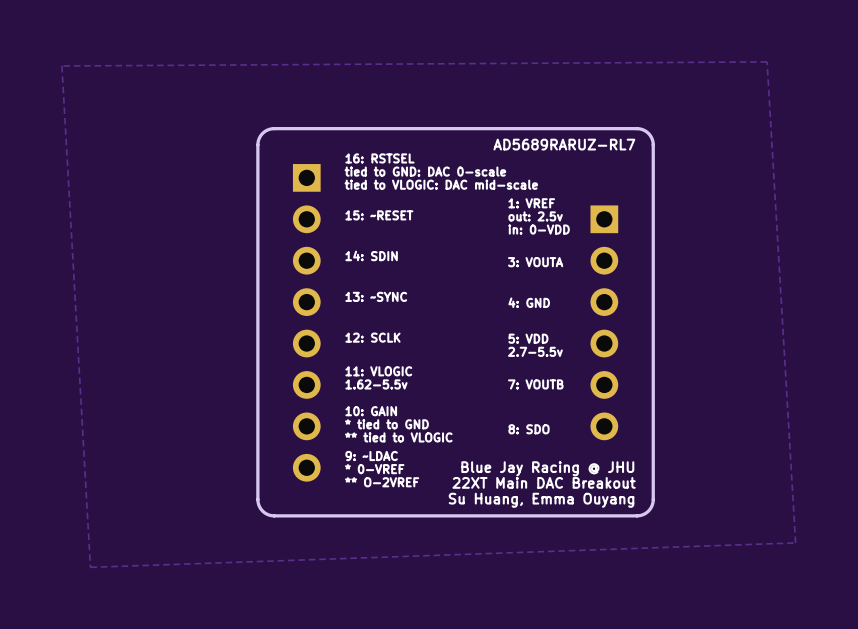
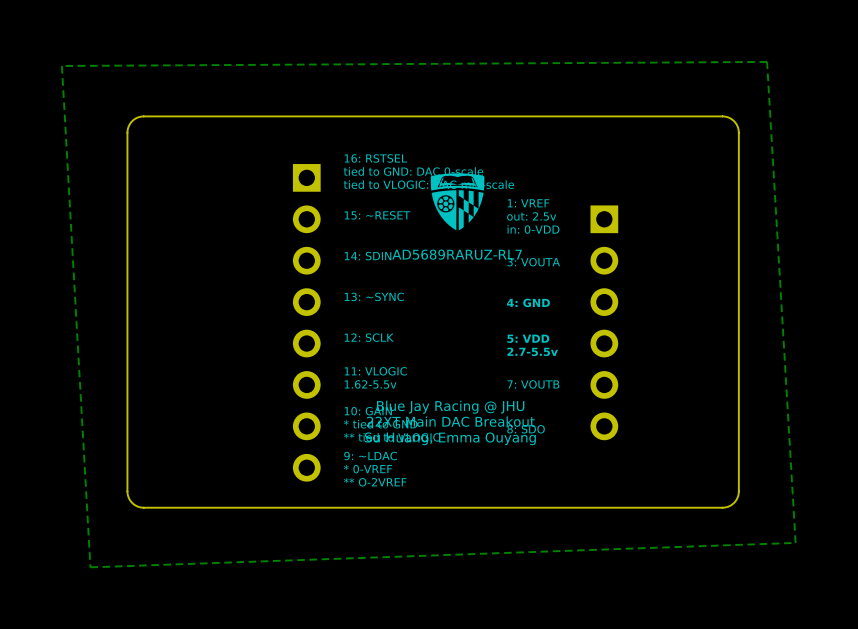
board edge: (636, 128) (274, 128) (262, 133) (257, 144) (257, 499) (262, 511) (274, 515) (636, 515) (648, 511) (653, 499) (653, 144) (648, 133) (636, 128) -> (722, 116) (734, 121) (738, 132) (738, 491) (737, 498) (731, 505) (722, 507) (143, 507) (136, 506) (129, 500) (127, 491) (127, 132) (129, 124) (135, 118) (143, 116) (722, 116)
text position: AD5689RARUZ-RL7 (564, 144) -> AD5689RARUZ-RL7 (457, 254)
drawing: none -> [430, 173, 485, 231]
text position: Blue Jay Racing @ JHU (547, 468) -> Blue Jay Racing @ JHU (450, 407)
text position: 22XT Main DAC Breakout (544, 482) -> 22XT Main DAC Breakout (450, 421)
text position: Su Huang, Emma Ouyang (541, 500) -> Su Huang, Emma Ouyang (450, 438)

